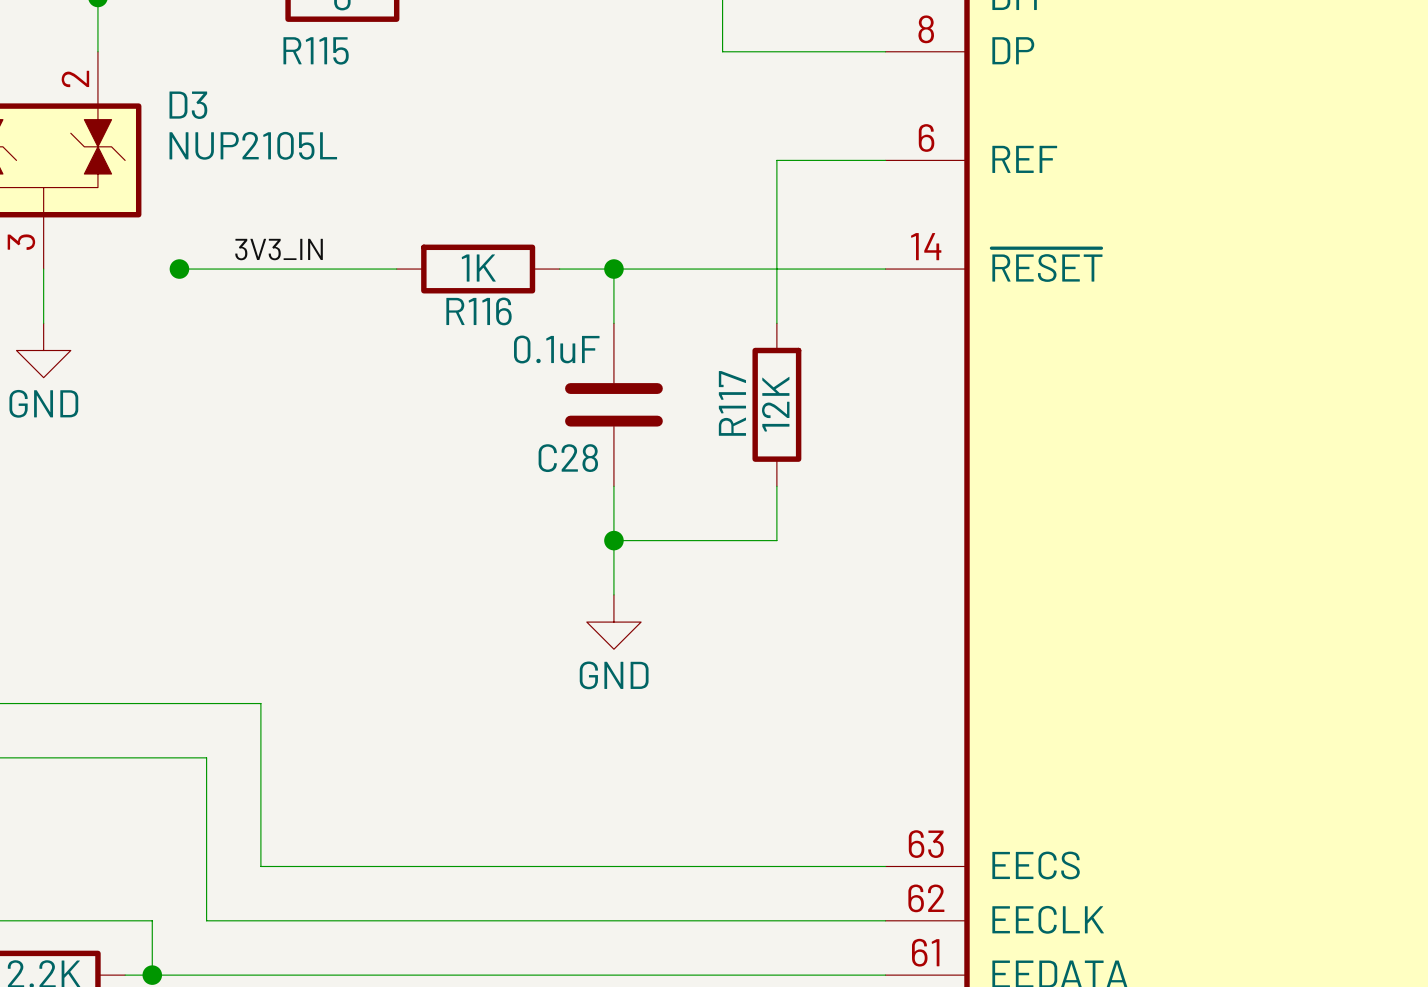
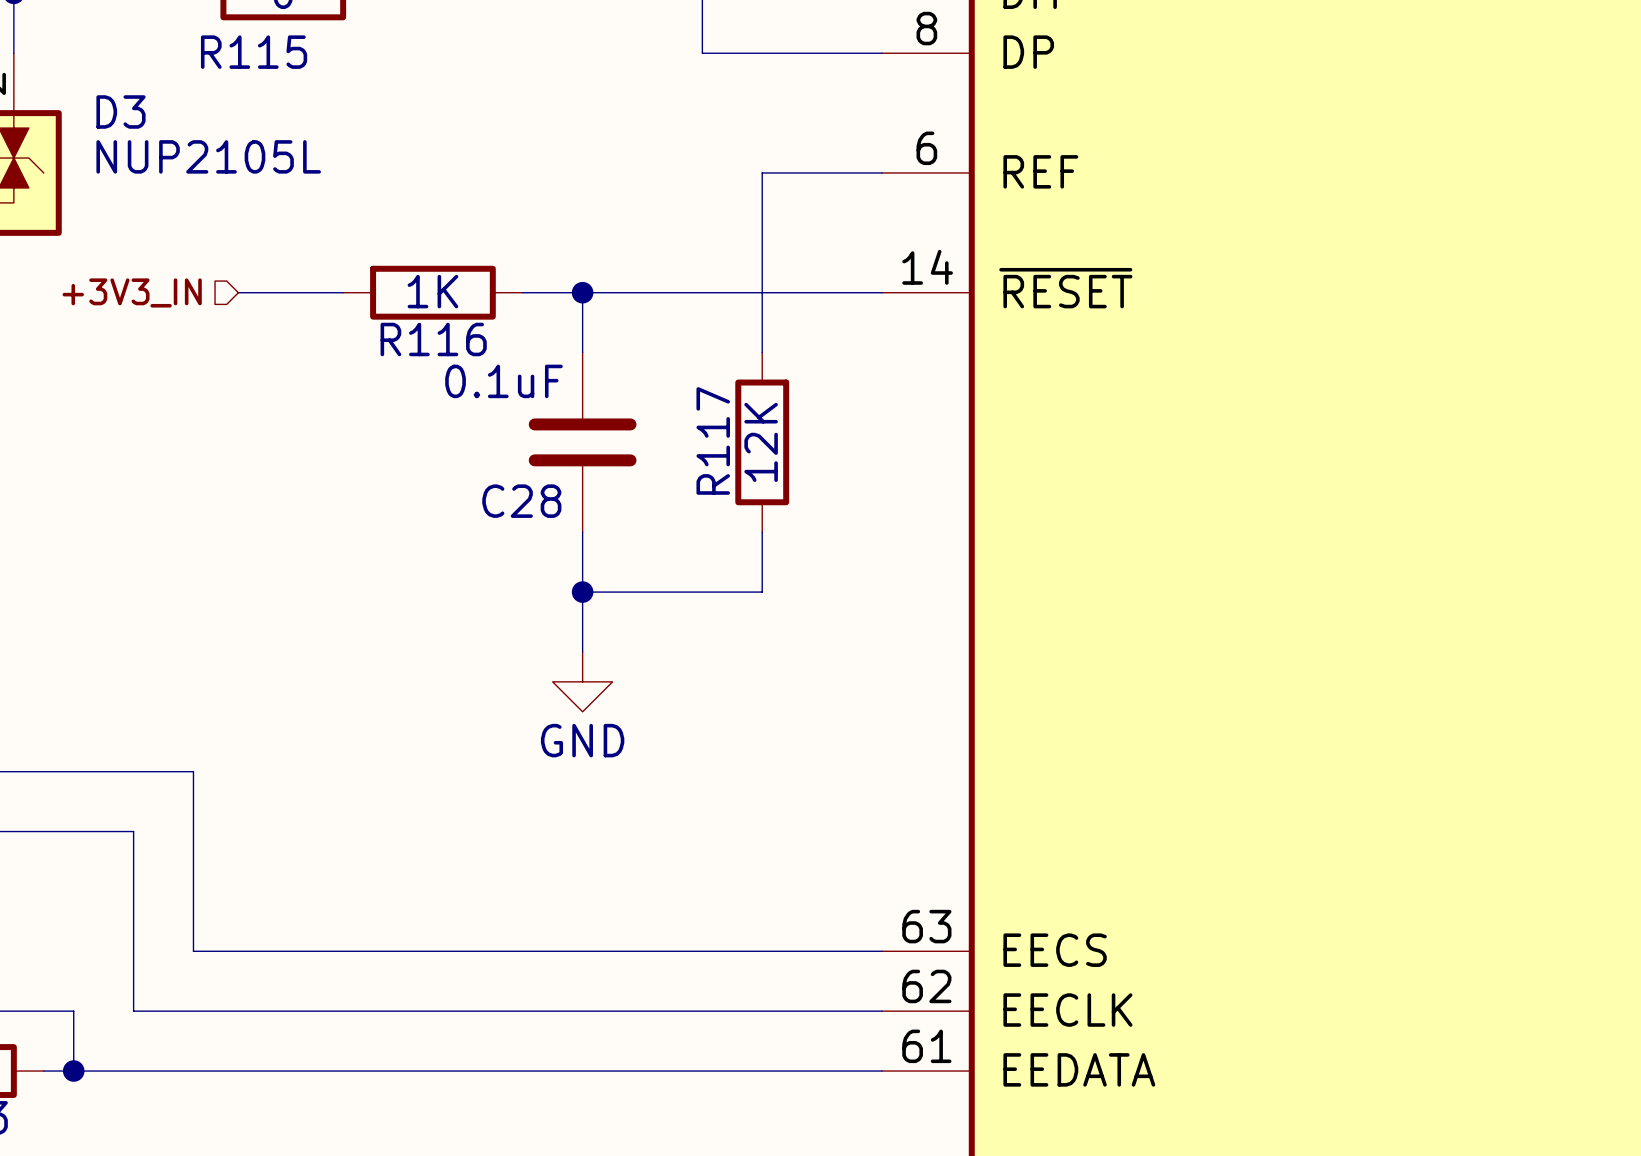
label: 3V3_IN (279, 249) -> none
hierarchical label: none -> +3V3_IN (132, 292)
wire: (179, 269) (301, 269) -> none
junction: (179, 269) -> none

